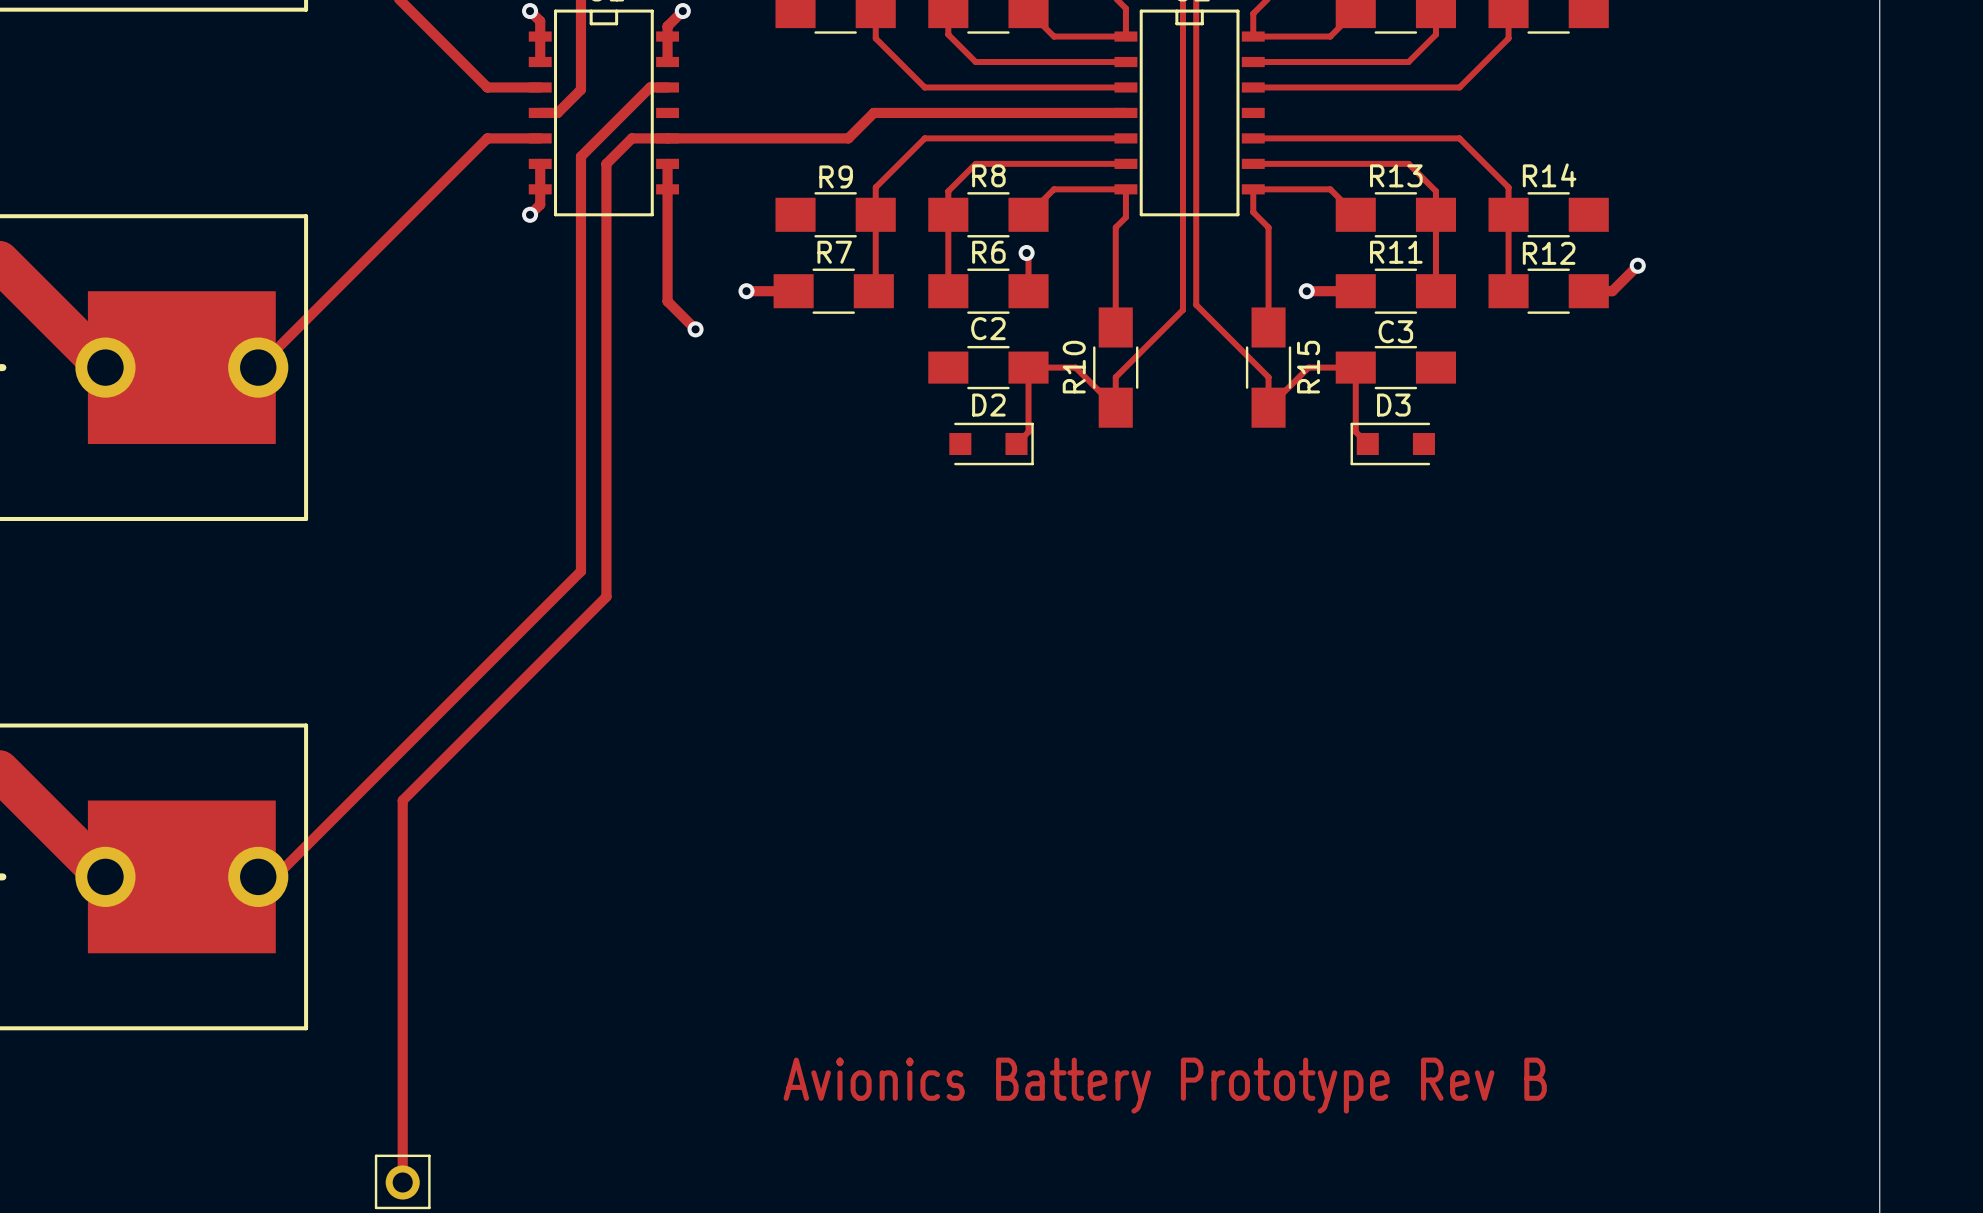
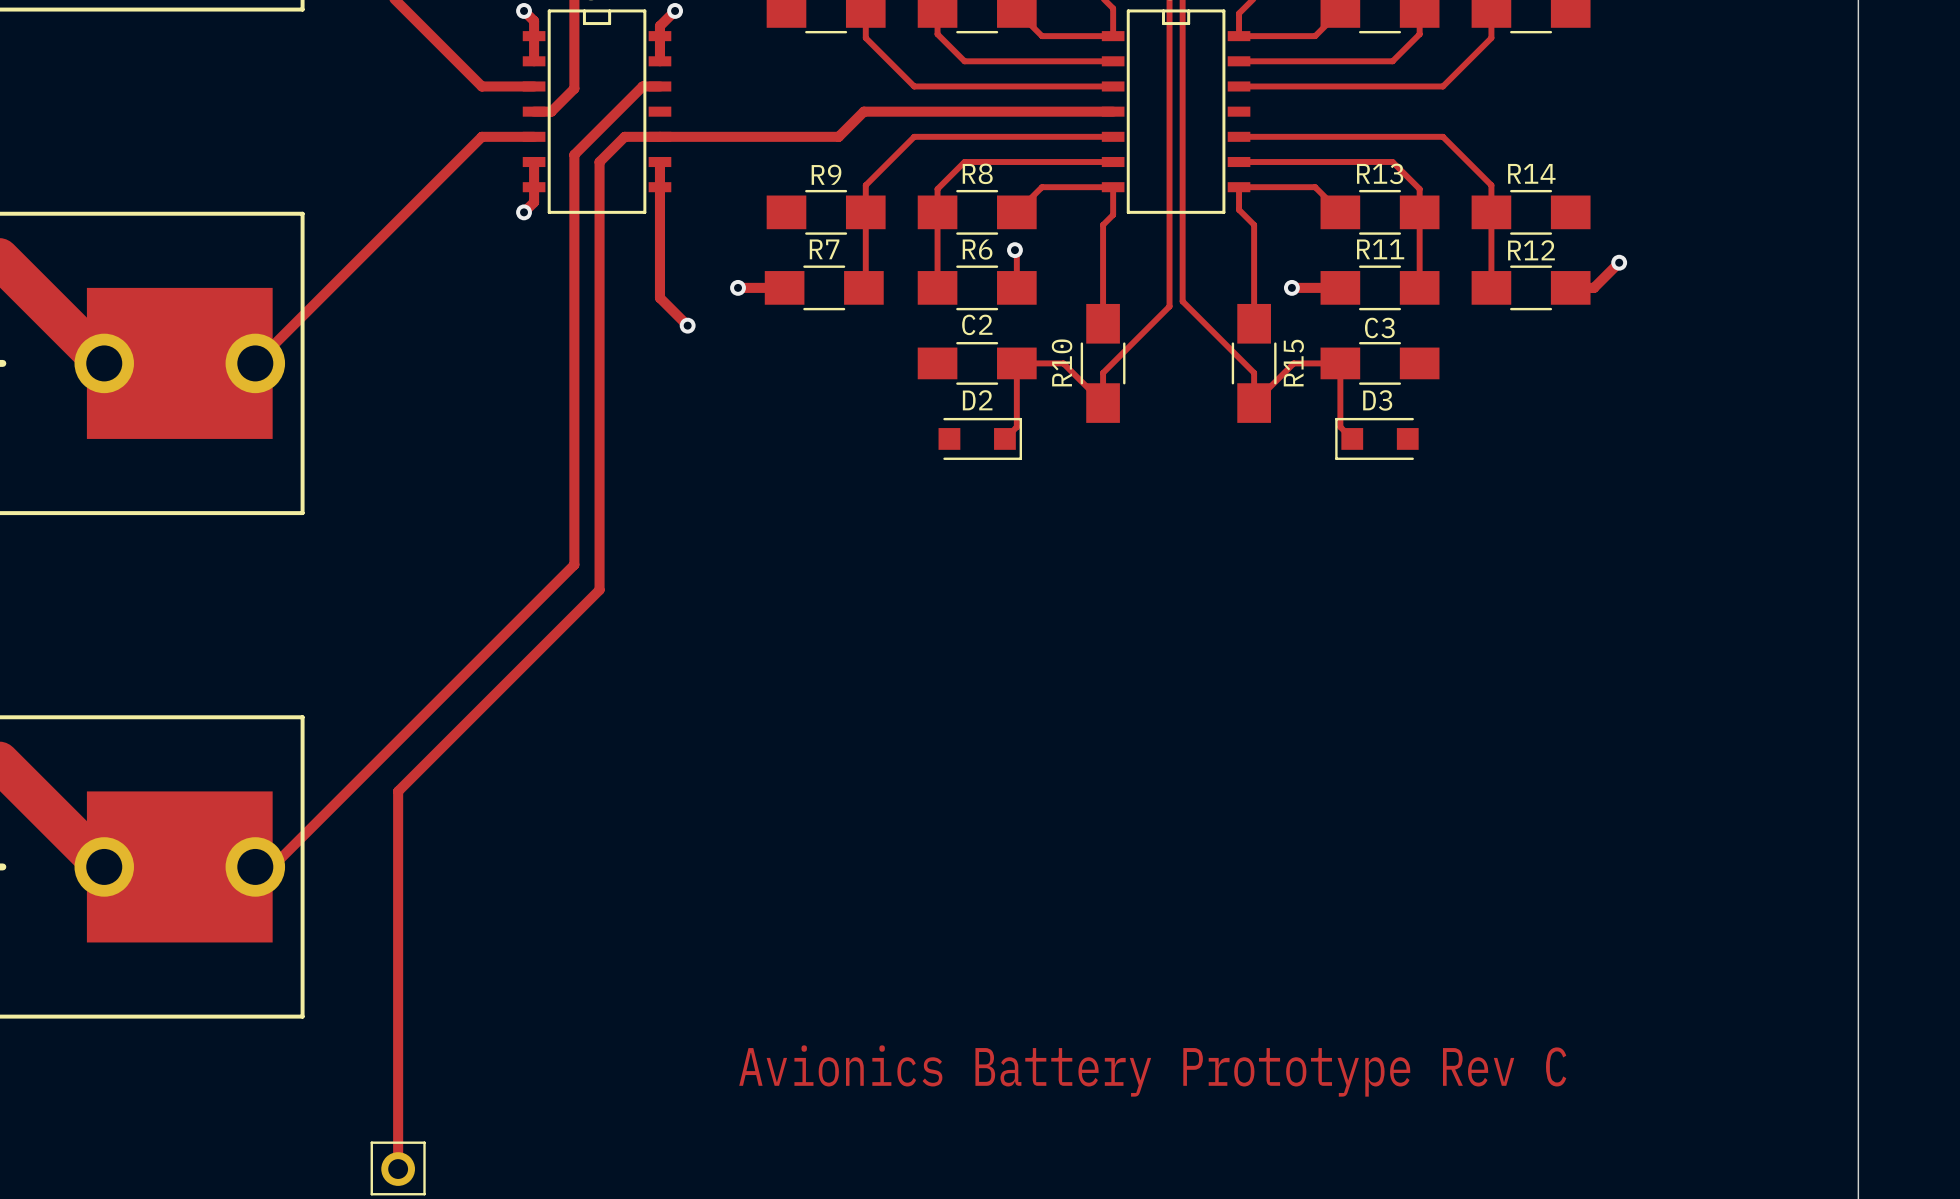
text: Avionics Battery Prototype Rev B (1165, 1085) -> Avionics Battery Prototype Rev C (1152, 1071)

